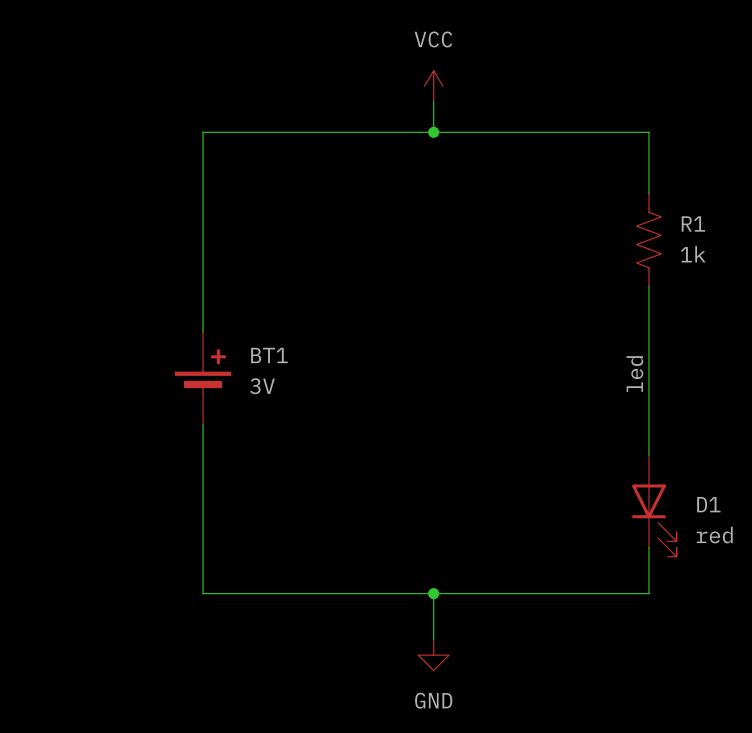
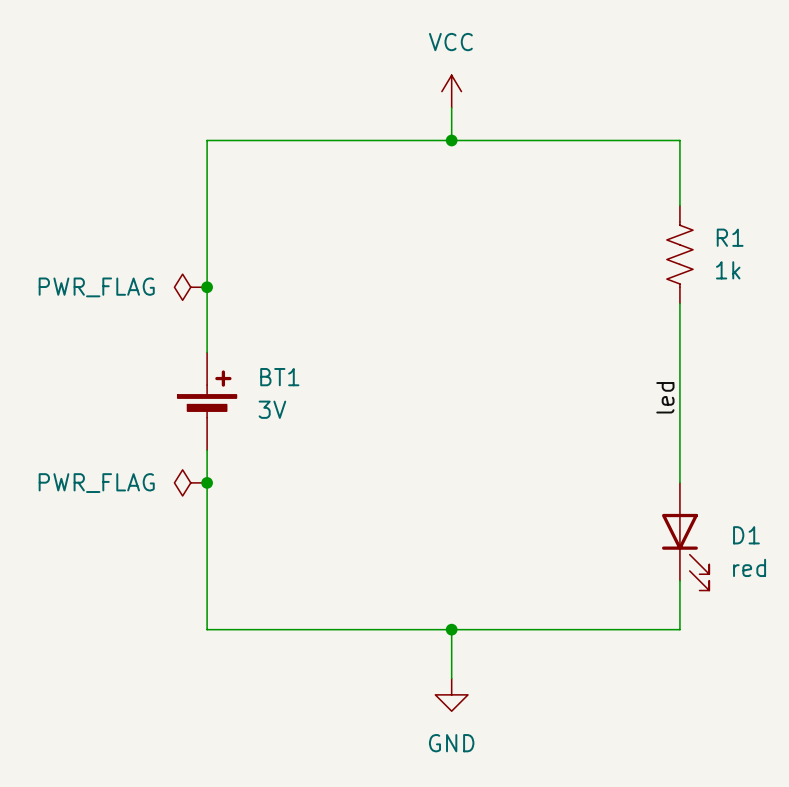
power symbol: none -> PWR_FLAG (190, 287)
junction: none -> (207, 287)
power symbol: none -> PWR_FLAG (190, 482)
junction: none -> (207, 482)

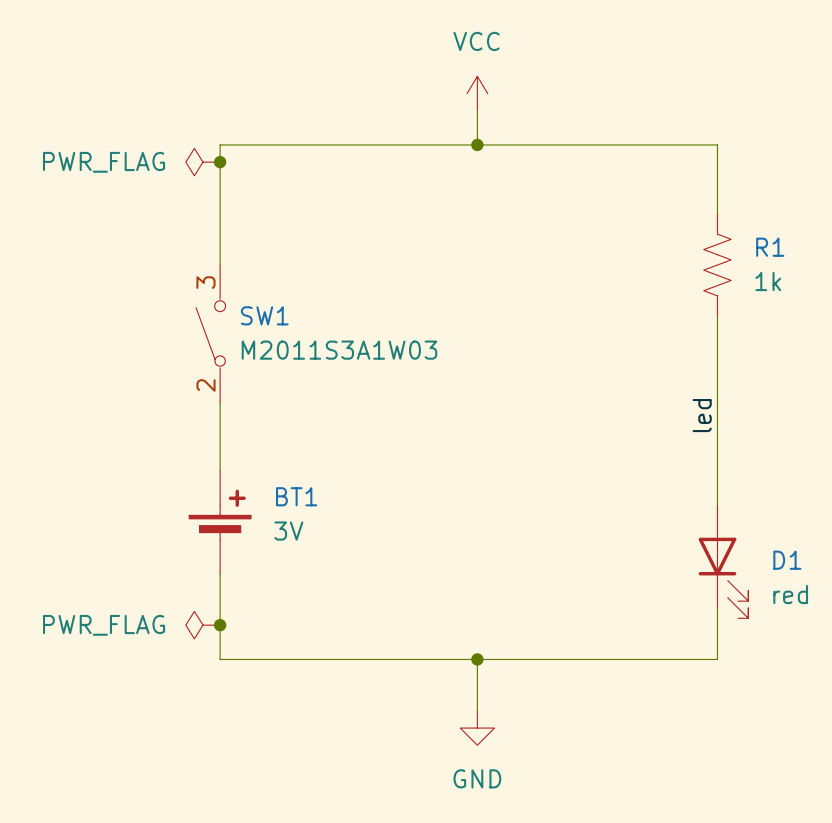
junction: none -> (220, 162)
wire: (207, 254) (207, 352) -> none
power symbol position: PWR_FLAG (190, 287) -> PWR_FLAG (202, 162)
junction: (207, 287) -> none
SW1: none -> M2011S3A1W03 (210, 333)
BT1 position: (207, 401) -> (220, 522)
power symbol position: PWR_FLAG (190, 482) -> PWR_FLAG (202, 625)
junction: (207, 482) -> none
junction: none -> (220, 625)

